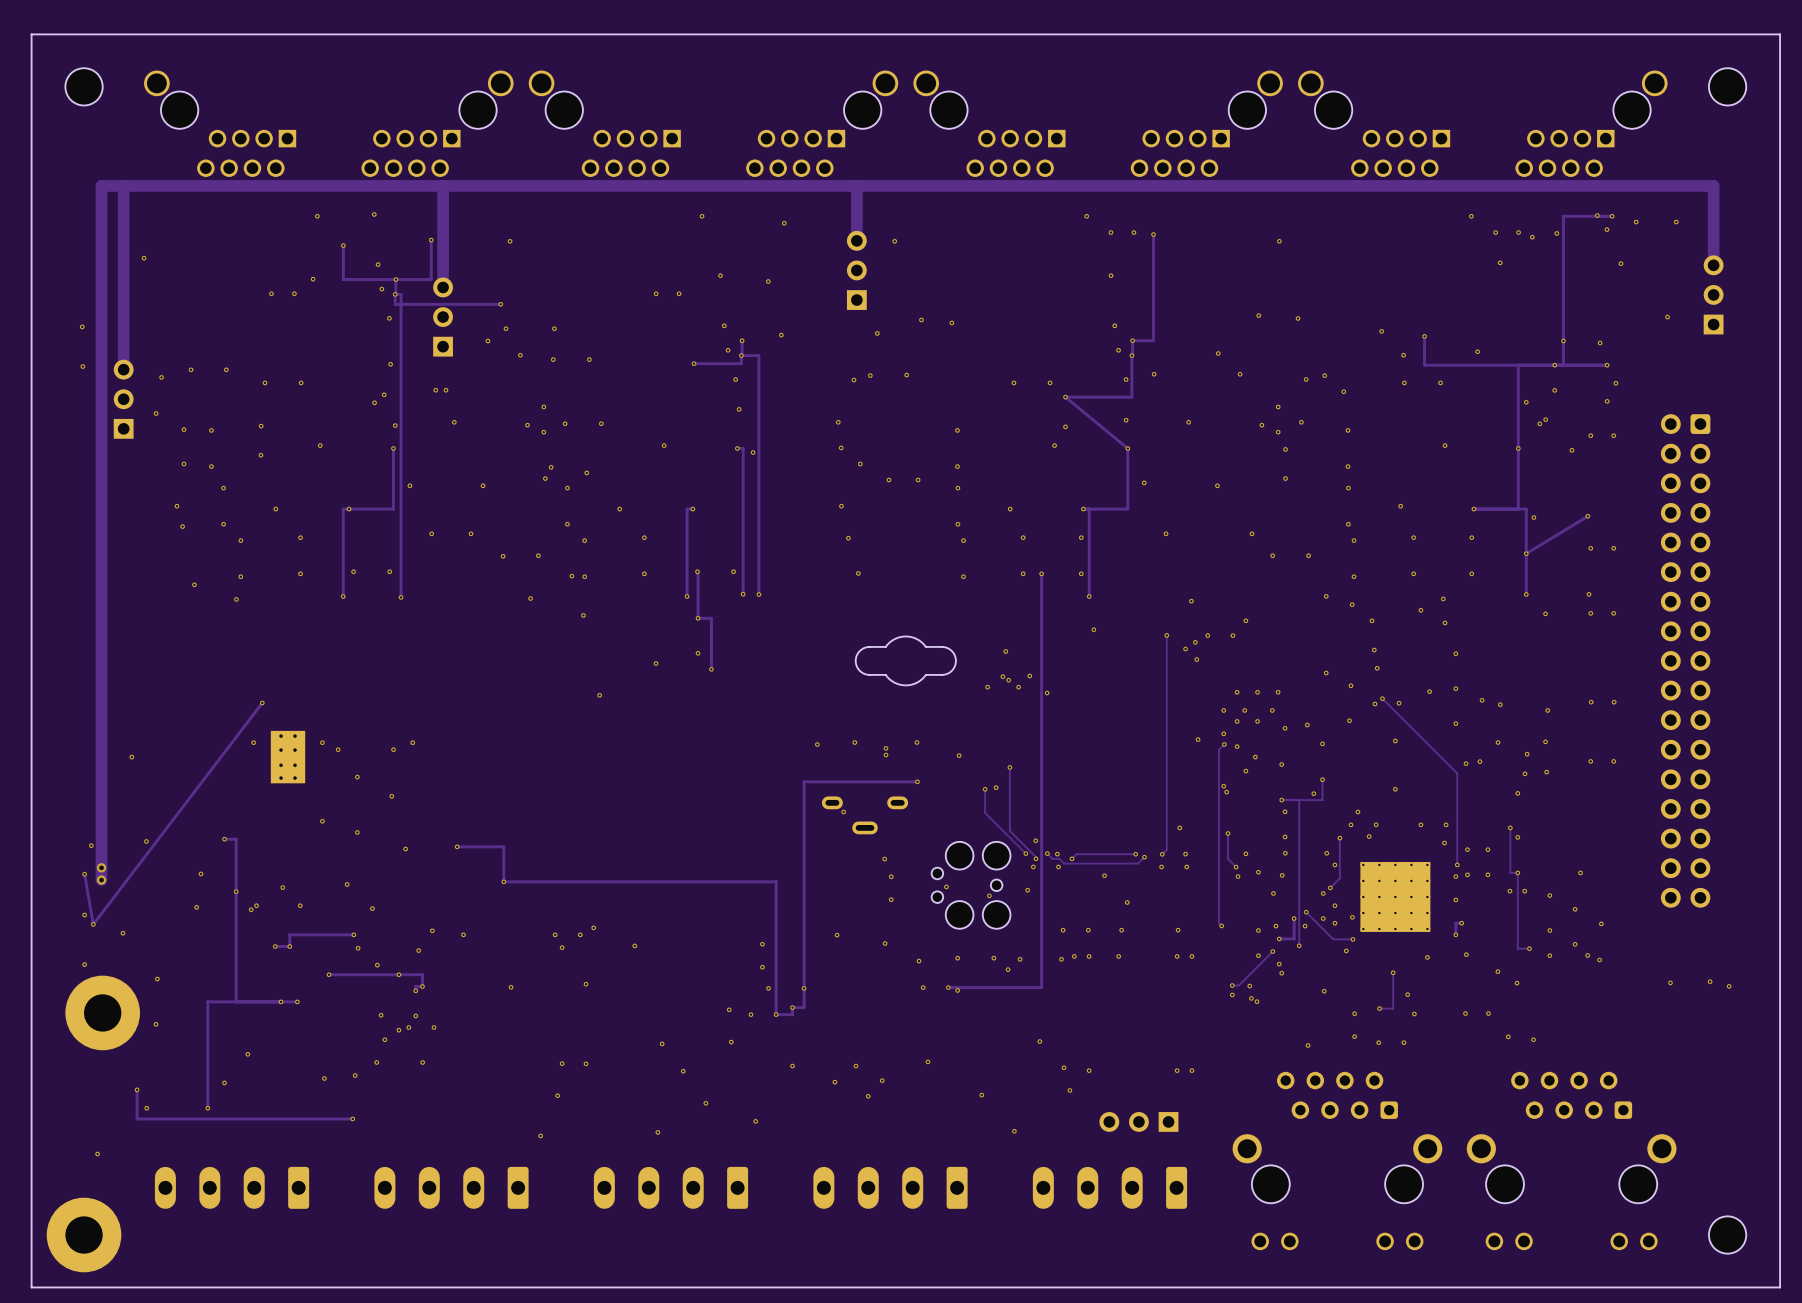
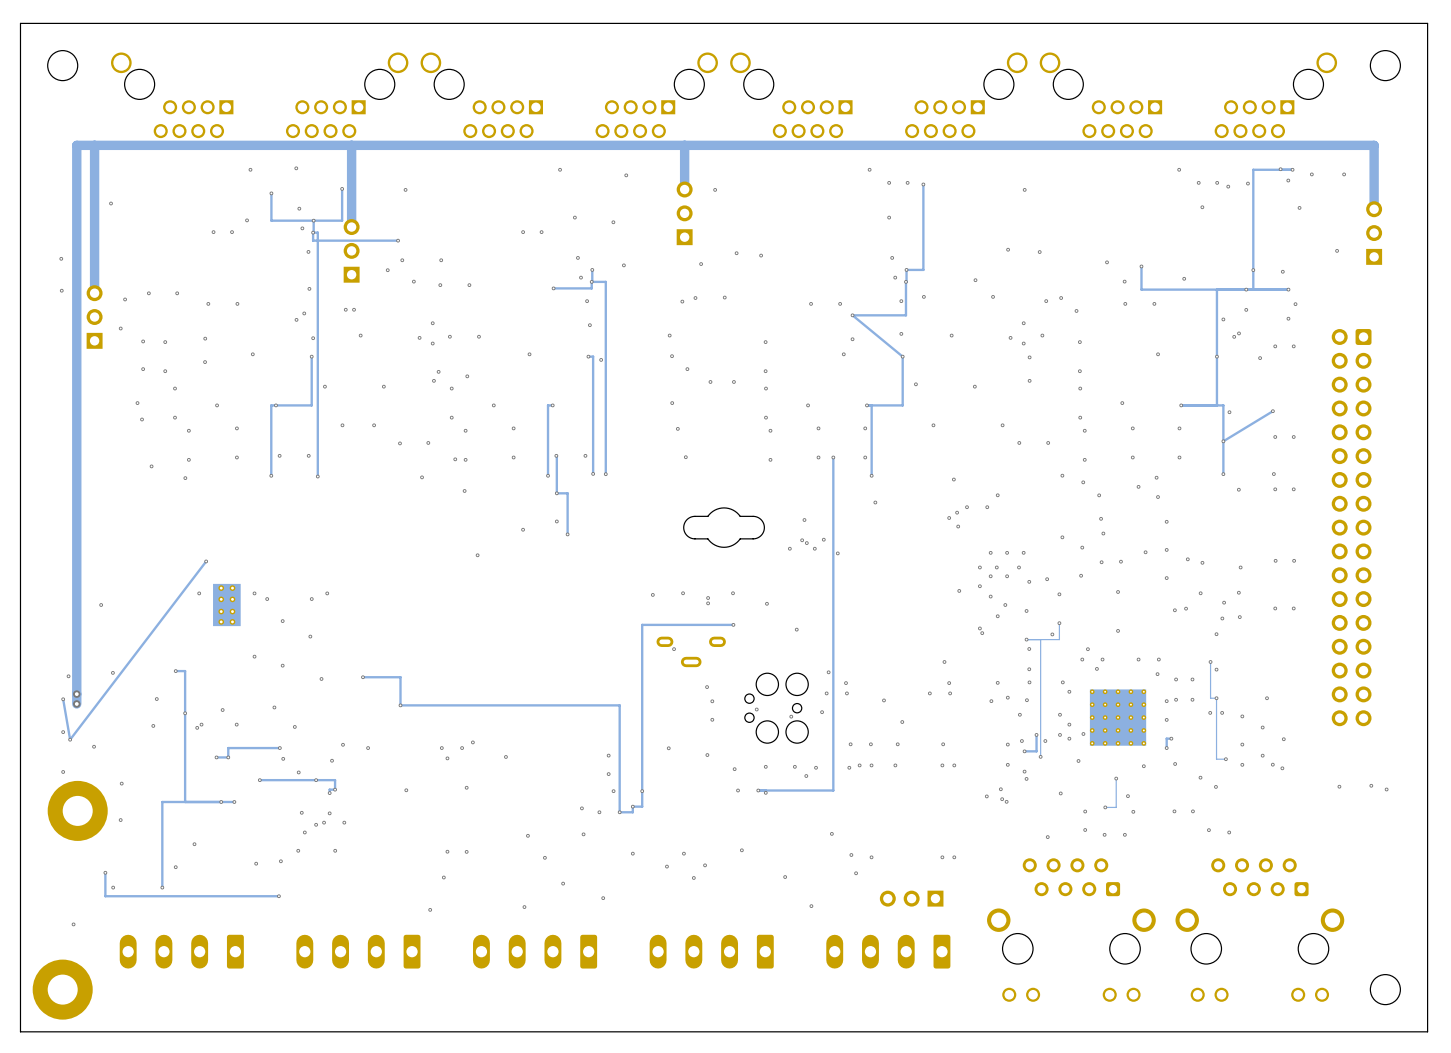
track: (1166, 635) (1166, 849) (1162, 854) -> none
via: (1166, 635) -> none
track: (1382, 698) (1457, 773) (1457, 864) -> none
via: (1382, 698) -> none
track: (1224, 744) (1218, 749) (1218, 923) (1221, 925) -> none
via: (1224, 744) -> none
track: (1009, 767) (1009, 831) (1036, 858) -> none
via: (1009, 767) -> none
track: (985, 789) (985, 812) (1025, 853) -> none
via: (985, 789) -> none
track: (1228, 833) (1228, 858) (1236, 867) -> none
via: (1228, 833) -> none
track: (1339, 838) (1339, 878) (1330, 887) -> none
via: (1339, 838) -> none
via: (1025, 853) -> none
track: (1047, 853) (1052, 858) (1059, 858) (1064, 863) (1138, 863) (1144, 857) -> none
via: (1047, 853) -> none
track: (1135, 854) (1076, 854) (1071, 858) -> none
via: (1135, 854) -> none
via: (1162, 854) -> none
via: (1144, 857) -> none
via: (1036, 858) -> none
via: (1071, 858) -> none
via: (1457, 864) -> none
via: (1236, 867) -> none
via: (1330, 887) -> none
track: (1306, 912) (1333, 939) (1352, 939) -> none
via: (1306, 912) -> none
via: (1221, 925) -> none
via: (1352, 939) -> none
track: (1272, 951) (1238, 985) (1232, 985) -> none
via: (1272, 951) -> none
via: (1232, 985) -> none

